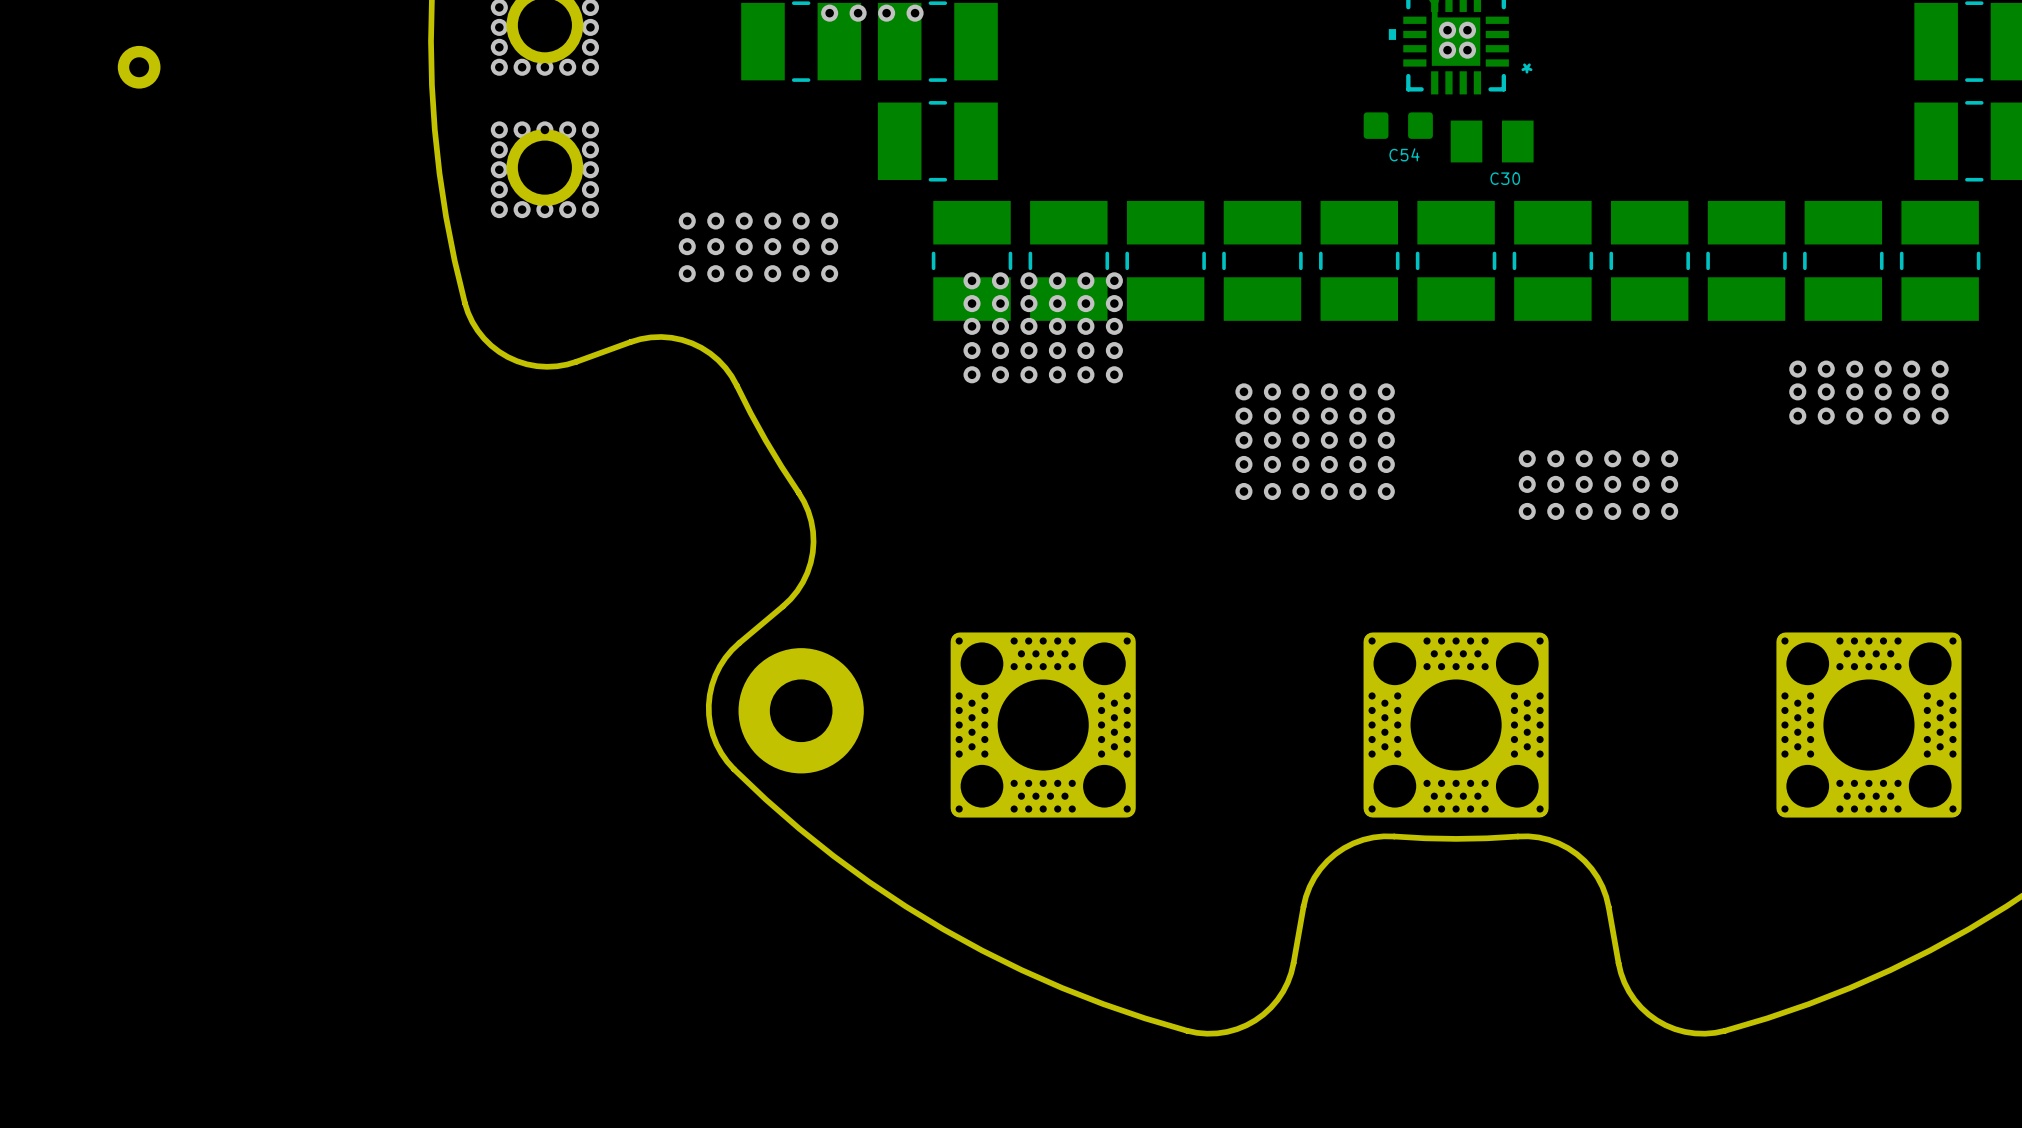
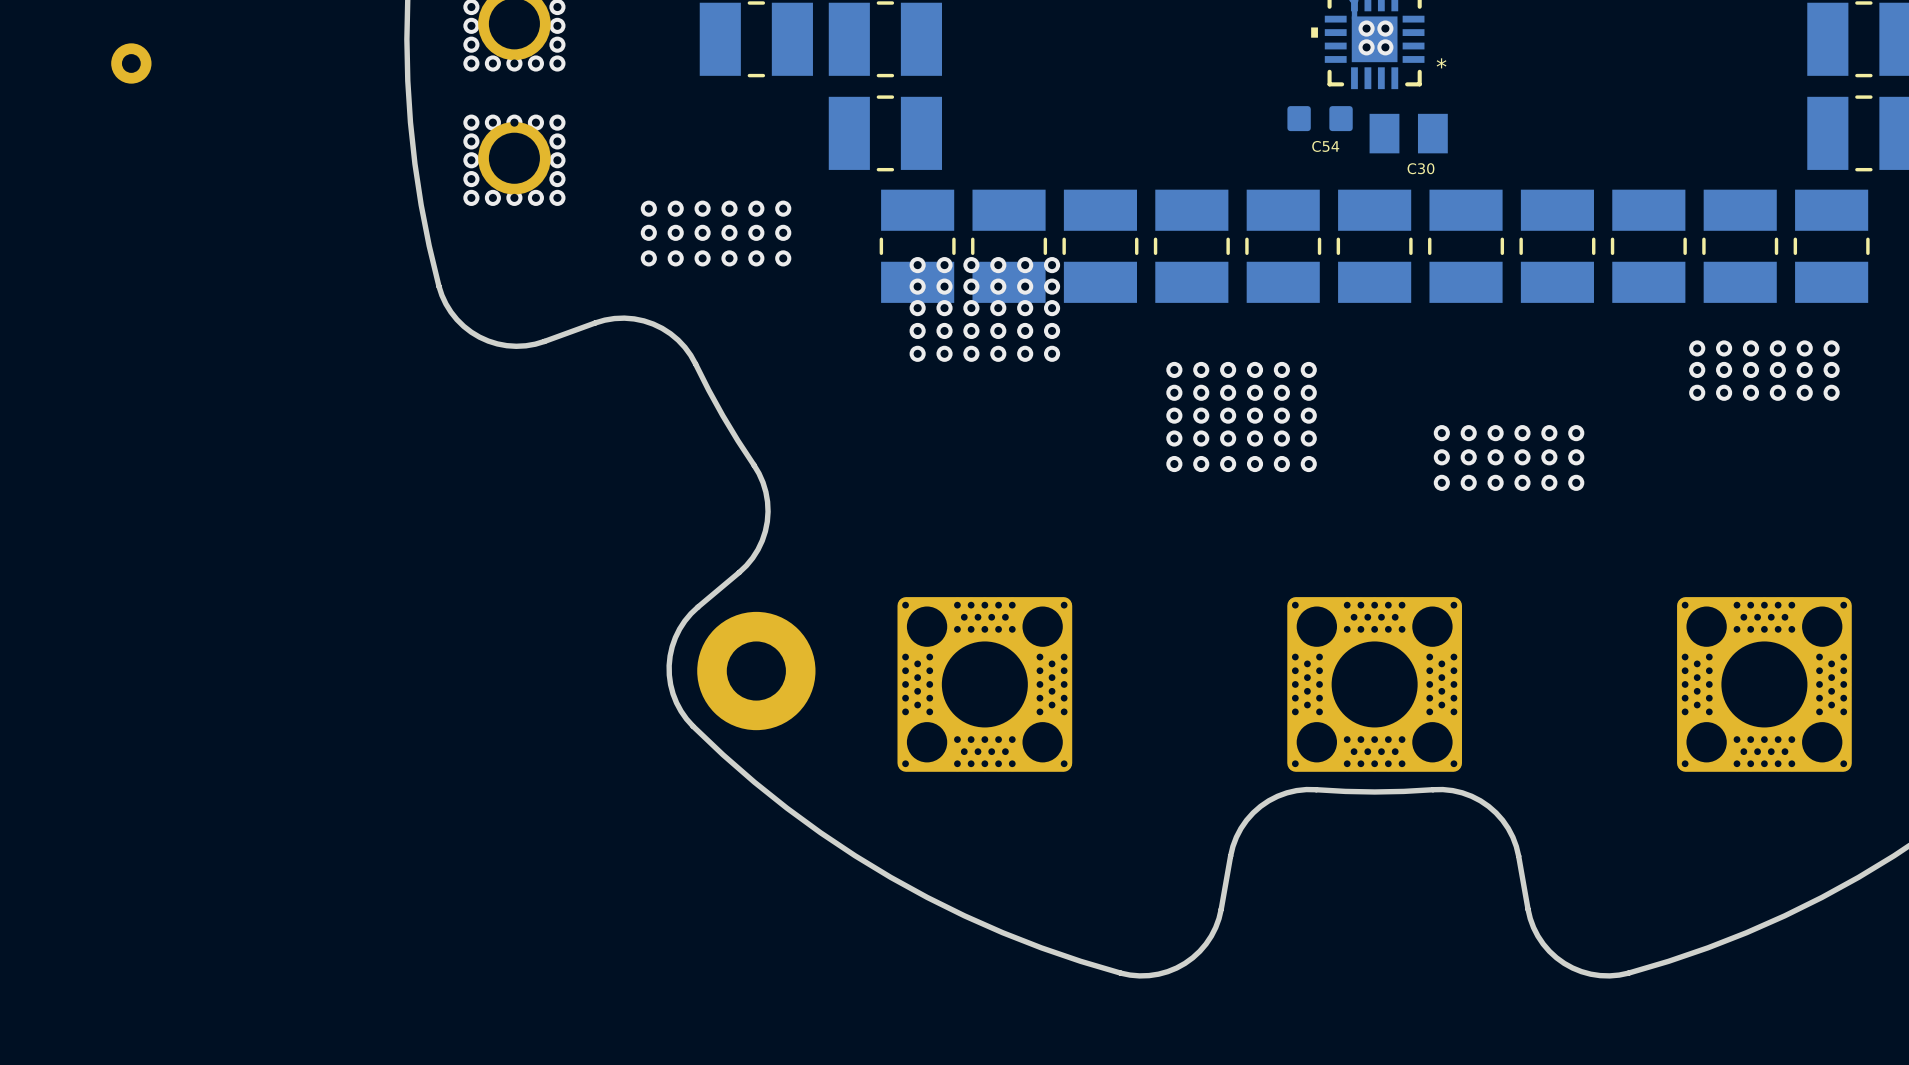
via: (829, 13) -> none
via: (858, 13) -> none
via: (886, 13) -> none
via: (915, 13) -> none

